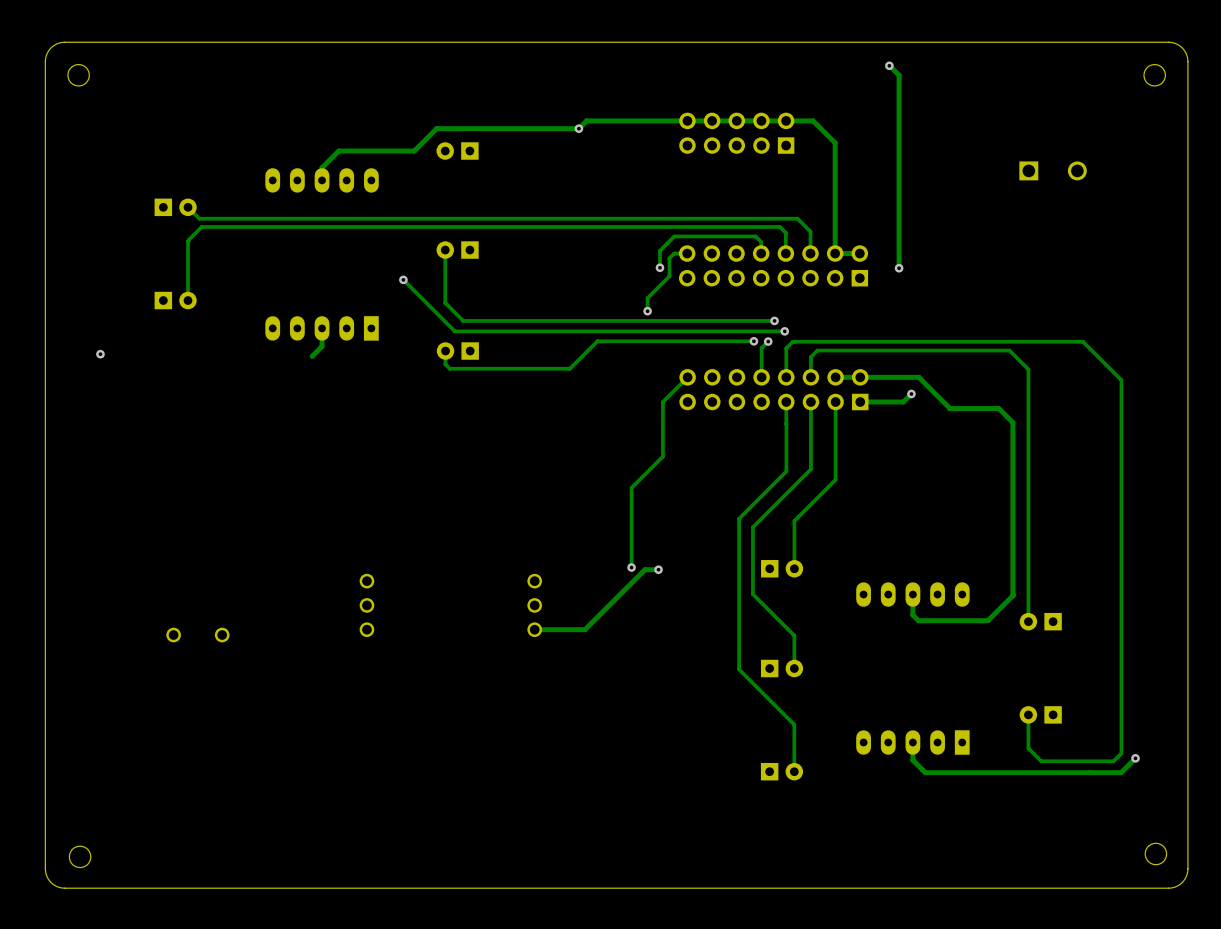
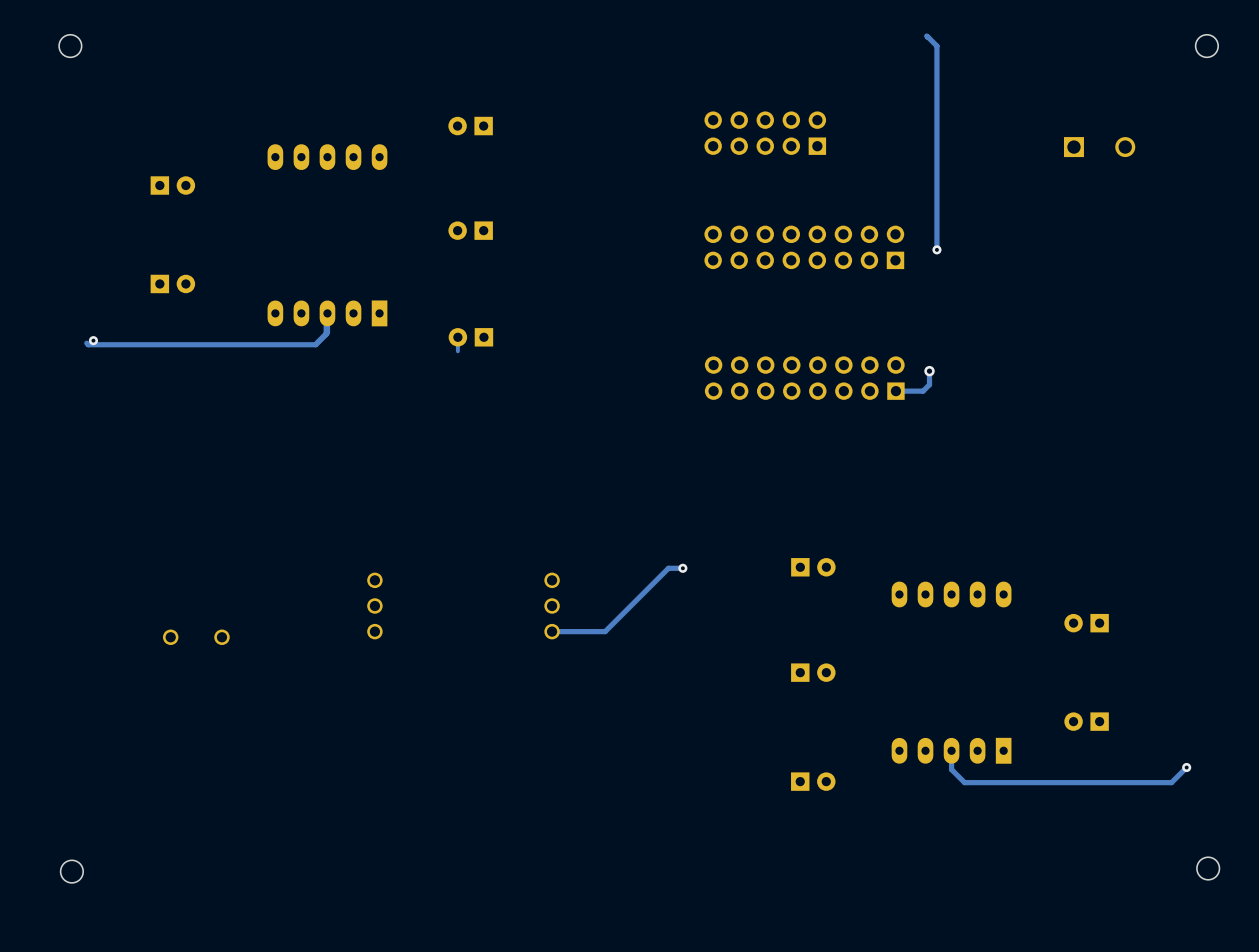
board edge: (1168, 42) (64, 42) (52, 46) (47, 53) (45, 61) (45, 868) (49, 880) (56, 886) (64, 888) (1168, 888) (1180, 883) (1186, 877) (1187, 868) (1187, 61) (1182, 47) (1168, 42) -> none
via: (889, 65) -> none
via: (578, 128) -> none
part position: (736, 133) -> (765, 133)
track: (322, 180) (322, 167) (338, 151) (414, 151) (436, 128) (578, 128) (586, 120) (813, 120) (835, 142) (835, 253) (859, 253) -> none
track: (188, 207) (199, 218) (797, 218) (810, 231) (810, 253) -> none
track: (445, 250) (445, 302) (463, 320) (774, 320) -> none
track: (687, 253) (674, 253) (669, 258) (669, 276) (647, 298) (647, 311) -> none
track: (761, 253) (761, 242) (755, 236) (674, 236) (659, 250) (659, 267) -> none
track: (785, 253) (785, 232) (779, 226) (201, 226) (188, 241) (188, 300) -> none
via: (659, 267) -> none
track: (403, 279) (454, 331) (784, 331) -> none
via: (403, 279) -> none
via: (647, 311) -> none
via: (774, 320) -> none
track: none -> (326, 315) (326, 334) (315, 344) (88, 344) (86, 343)
via: (784, 331) -> none
track: (753, 341) (597, 341) (569, 368) (449, 368) (445, 364) -> none
via: (753, 341) -> none
track: (768, 341) (761, 348) (761, 377) -> none
via: (768, 341) -> none
track: (687, 377) (662, 402) (662, 456) (631, 487) (631, 567) -> none
track: (786, 377) (786, 348) (792, 341) (1083, 341) (1121, 380) (1121, 753) (1113, 761) (1041, 761) (1028, 748) (1028, 714) -> none
track: (810, 377) (810, 357) (817, 350) (1009, 350) (1028, 369) (1028, 621) -> none
track: (835, 377) (918, 377) (950, 408) (998, 408) (1012, 422) (1013, 595) (987, 620) (918, 620) (912, 615) (912, 594) -> none
via: none -> (929, 371)
track: (911, 393) (903, 401) (885, 401) -> (929, 371) (929, 384) (923, 391)
via: (911, 393) -> none
track: (786, 401) (786, 471) (739, 518) (739, 669) (794, 724) (794, 771) -> none
track: (810, 401) (810, 469) (752, 527) (752, 594) (794, 635) (794, 668) -> none
track: (835, 401) (835, 479) (794, 520) (794, 568) -> none
via: (631, 567) -> none

